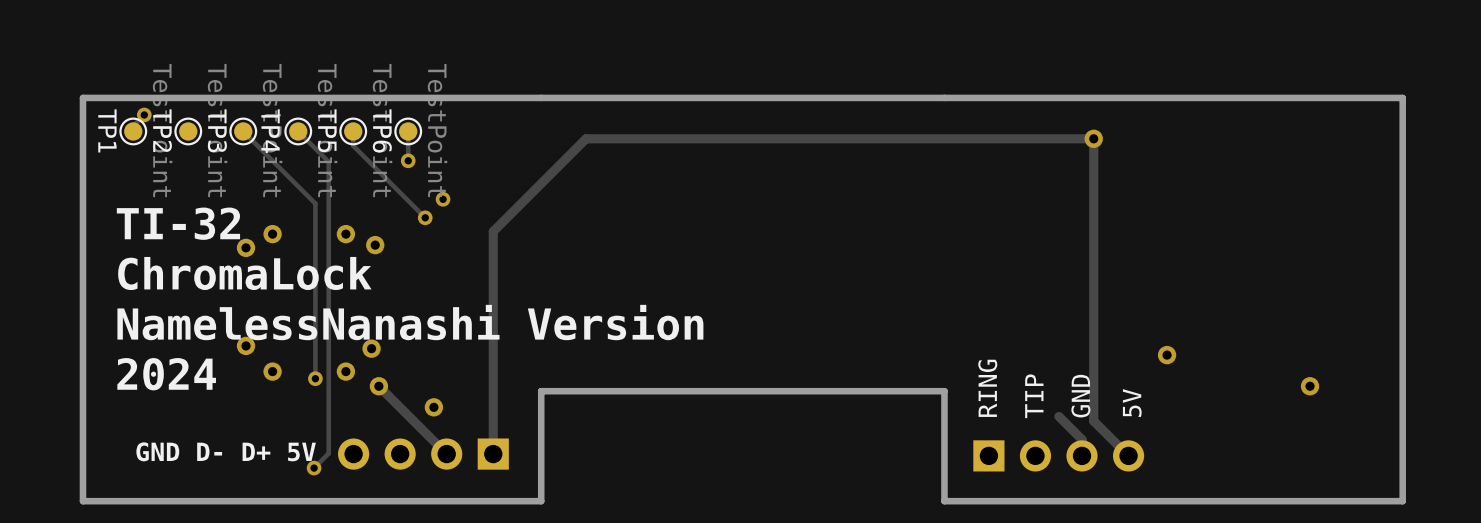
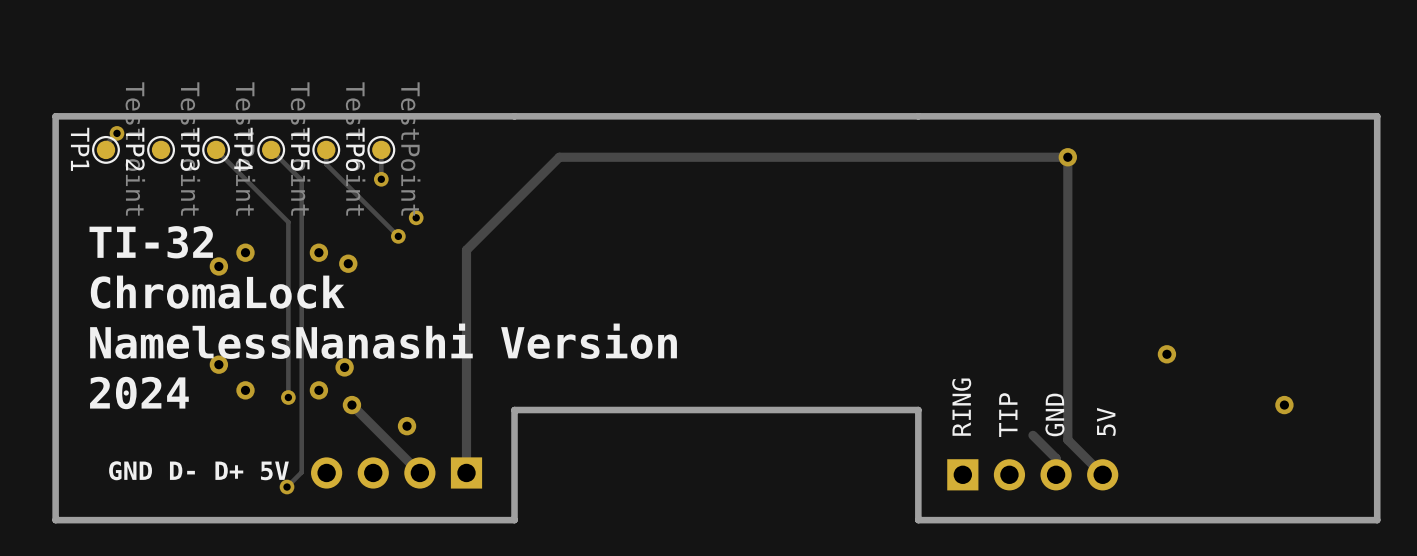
via position: (1167, 355) -> (1166, 354)

